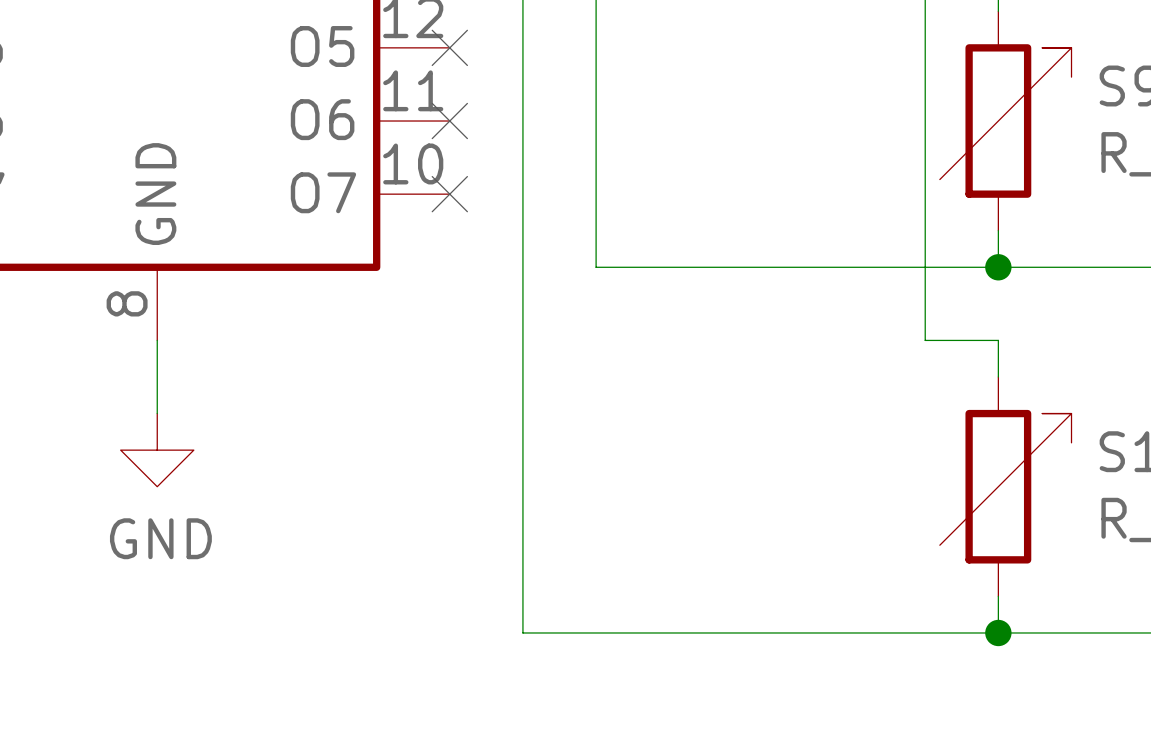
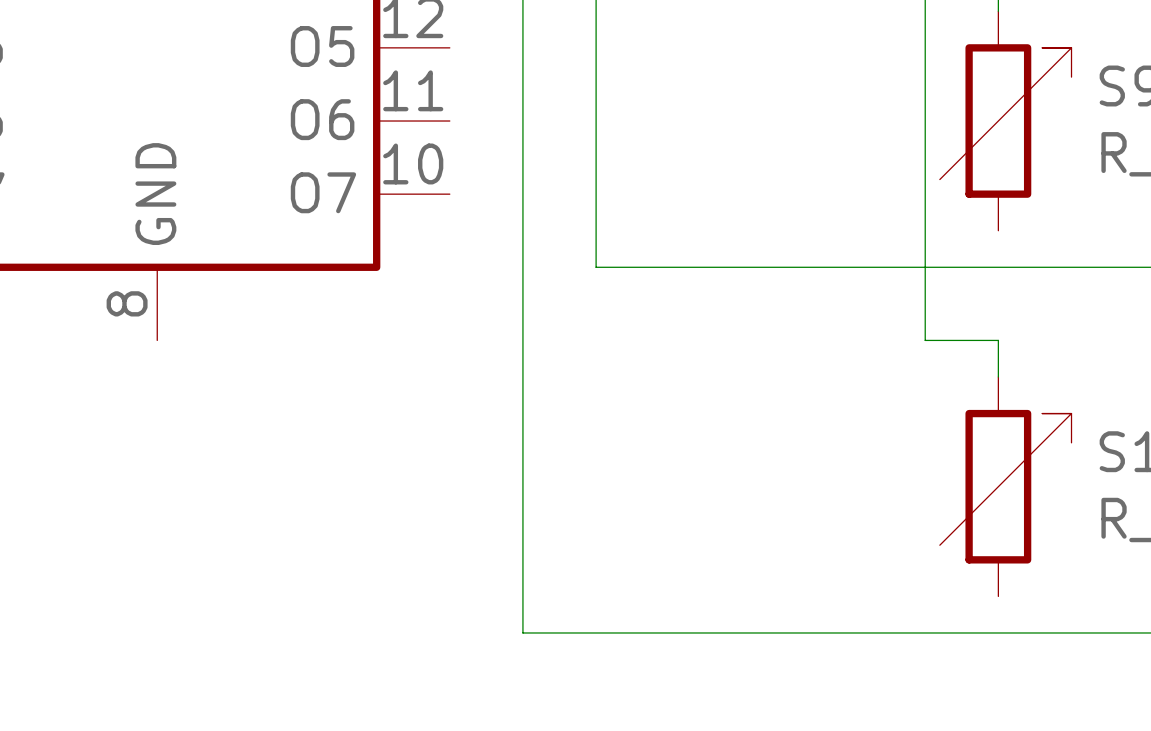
no-connect mark: (449, 47) -> none
no-connect mark: (449, 121) -> none
no-connect mark: (449, 194) -> none
wire: (998, 230) (998, 267) -> none
junction: (998, 267) -> none
wire: (157, 340) (157, 413) -> none
power symbol: GND (157, 450) -> none
wire: (998, 596) (998, 632) -> none
junction: (998, 632) -> none

